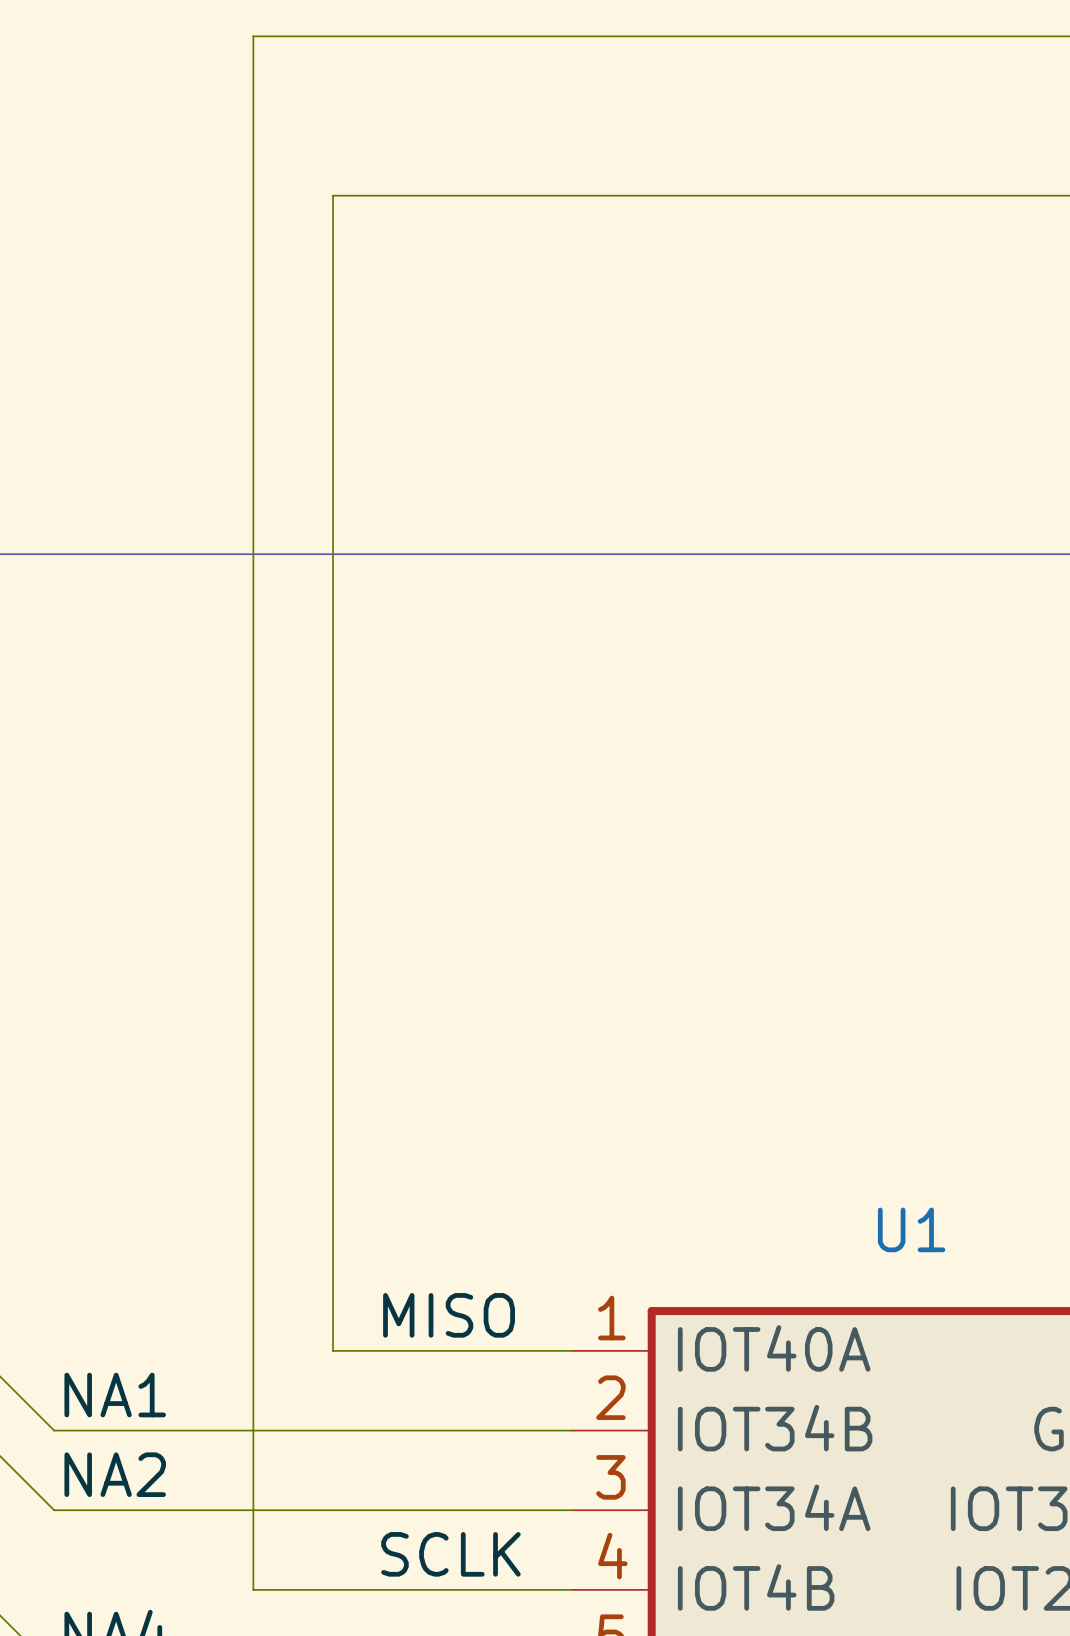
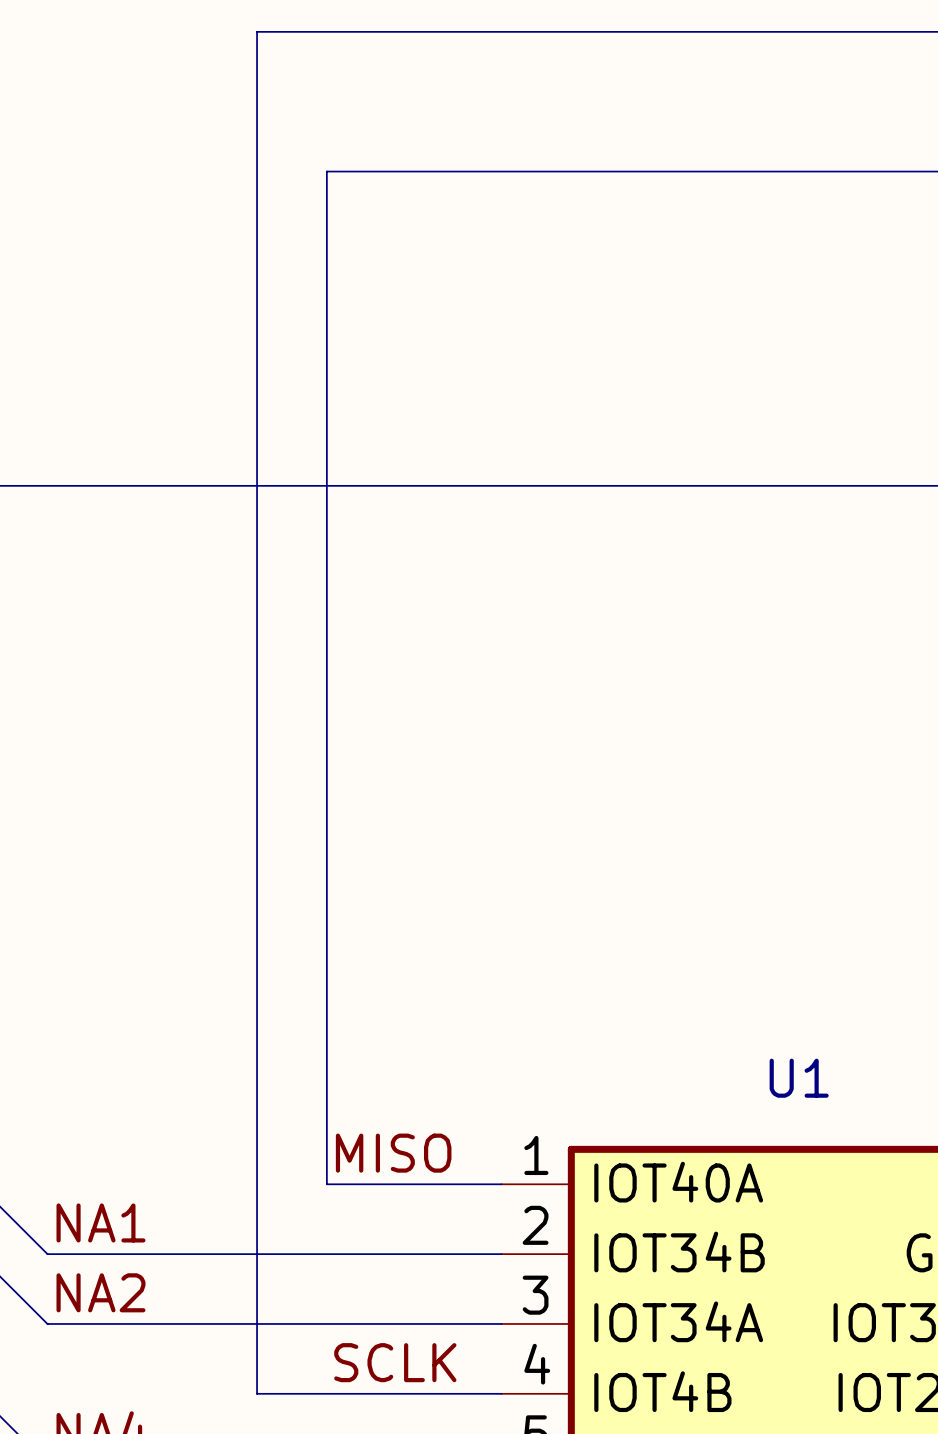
wire: (293, 36) (253, 36) (253, 1589) (293, 1589) -> (257, 31) (257, 1393)
wire: (372, 195) (333, 195) (333, 1350) (372, 1350) -> (326, 171) (326, 1184)

